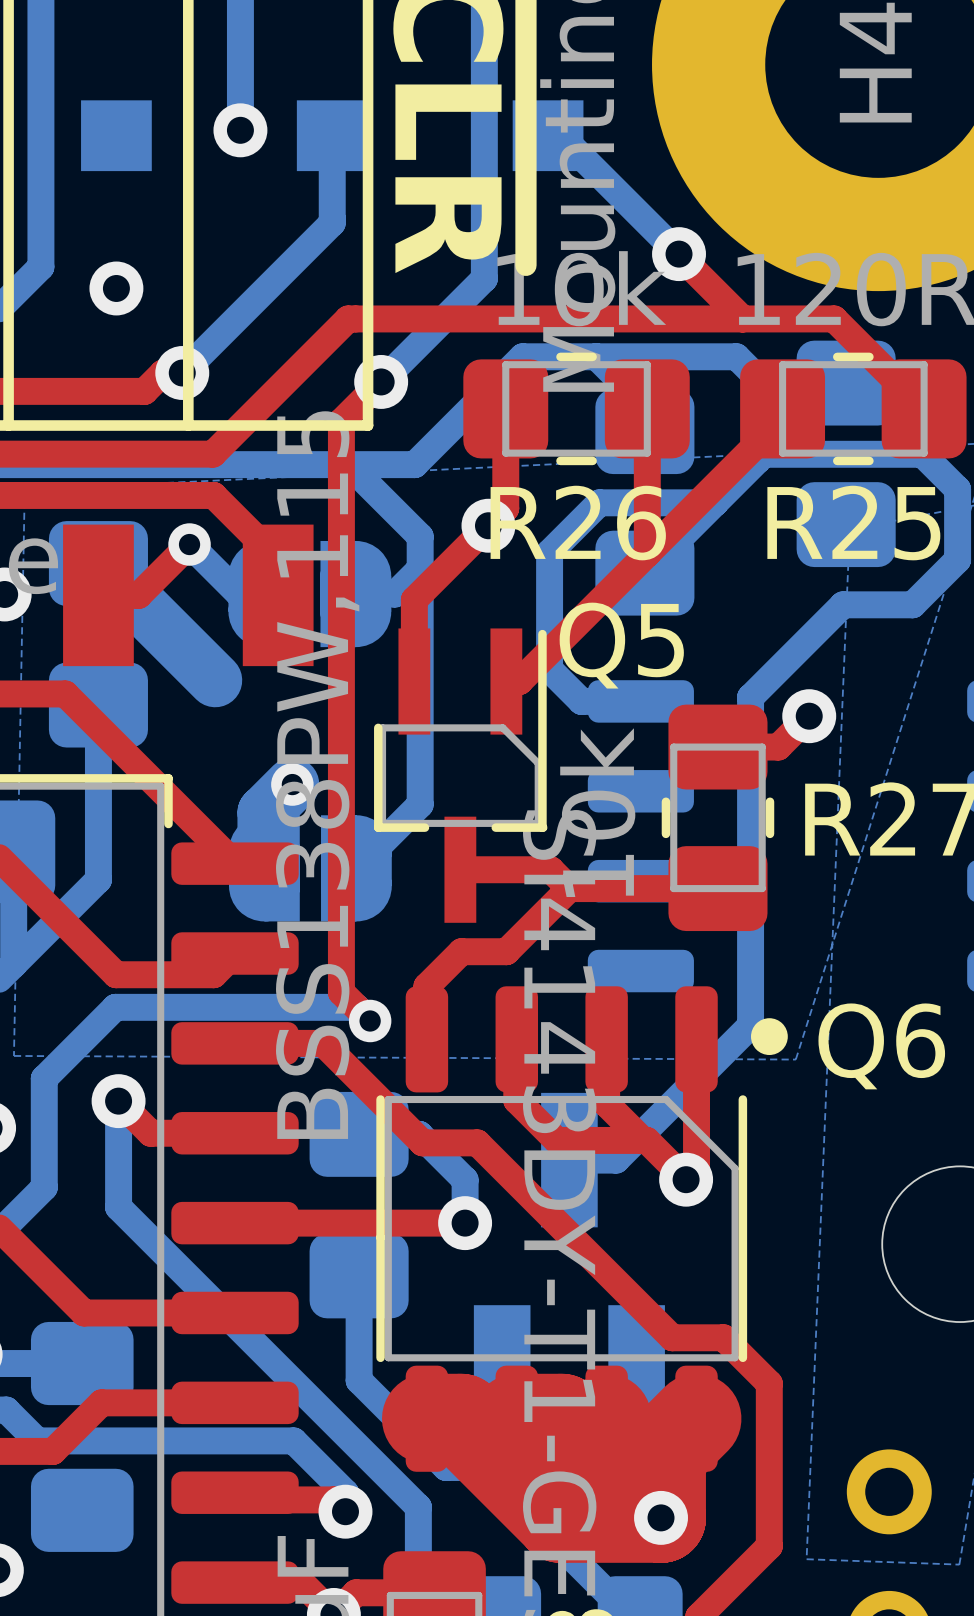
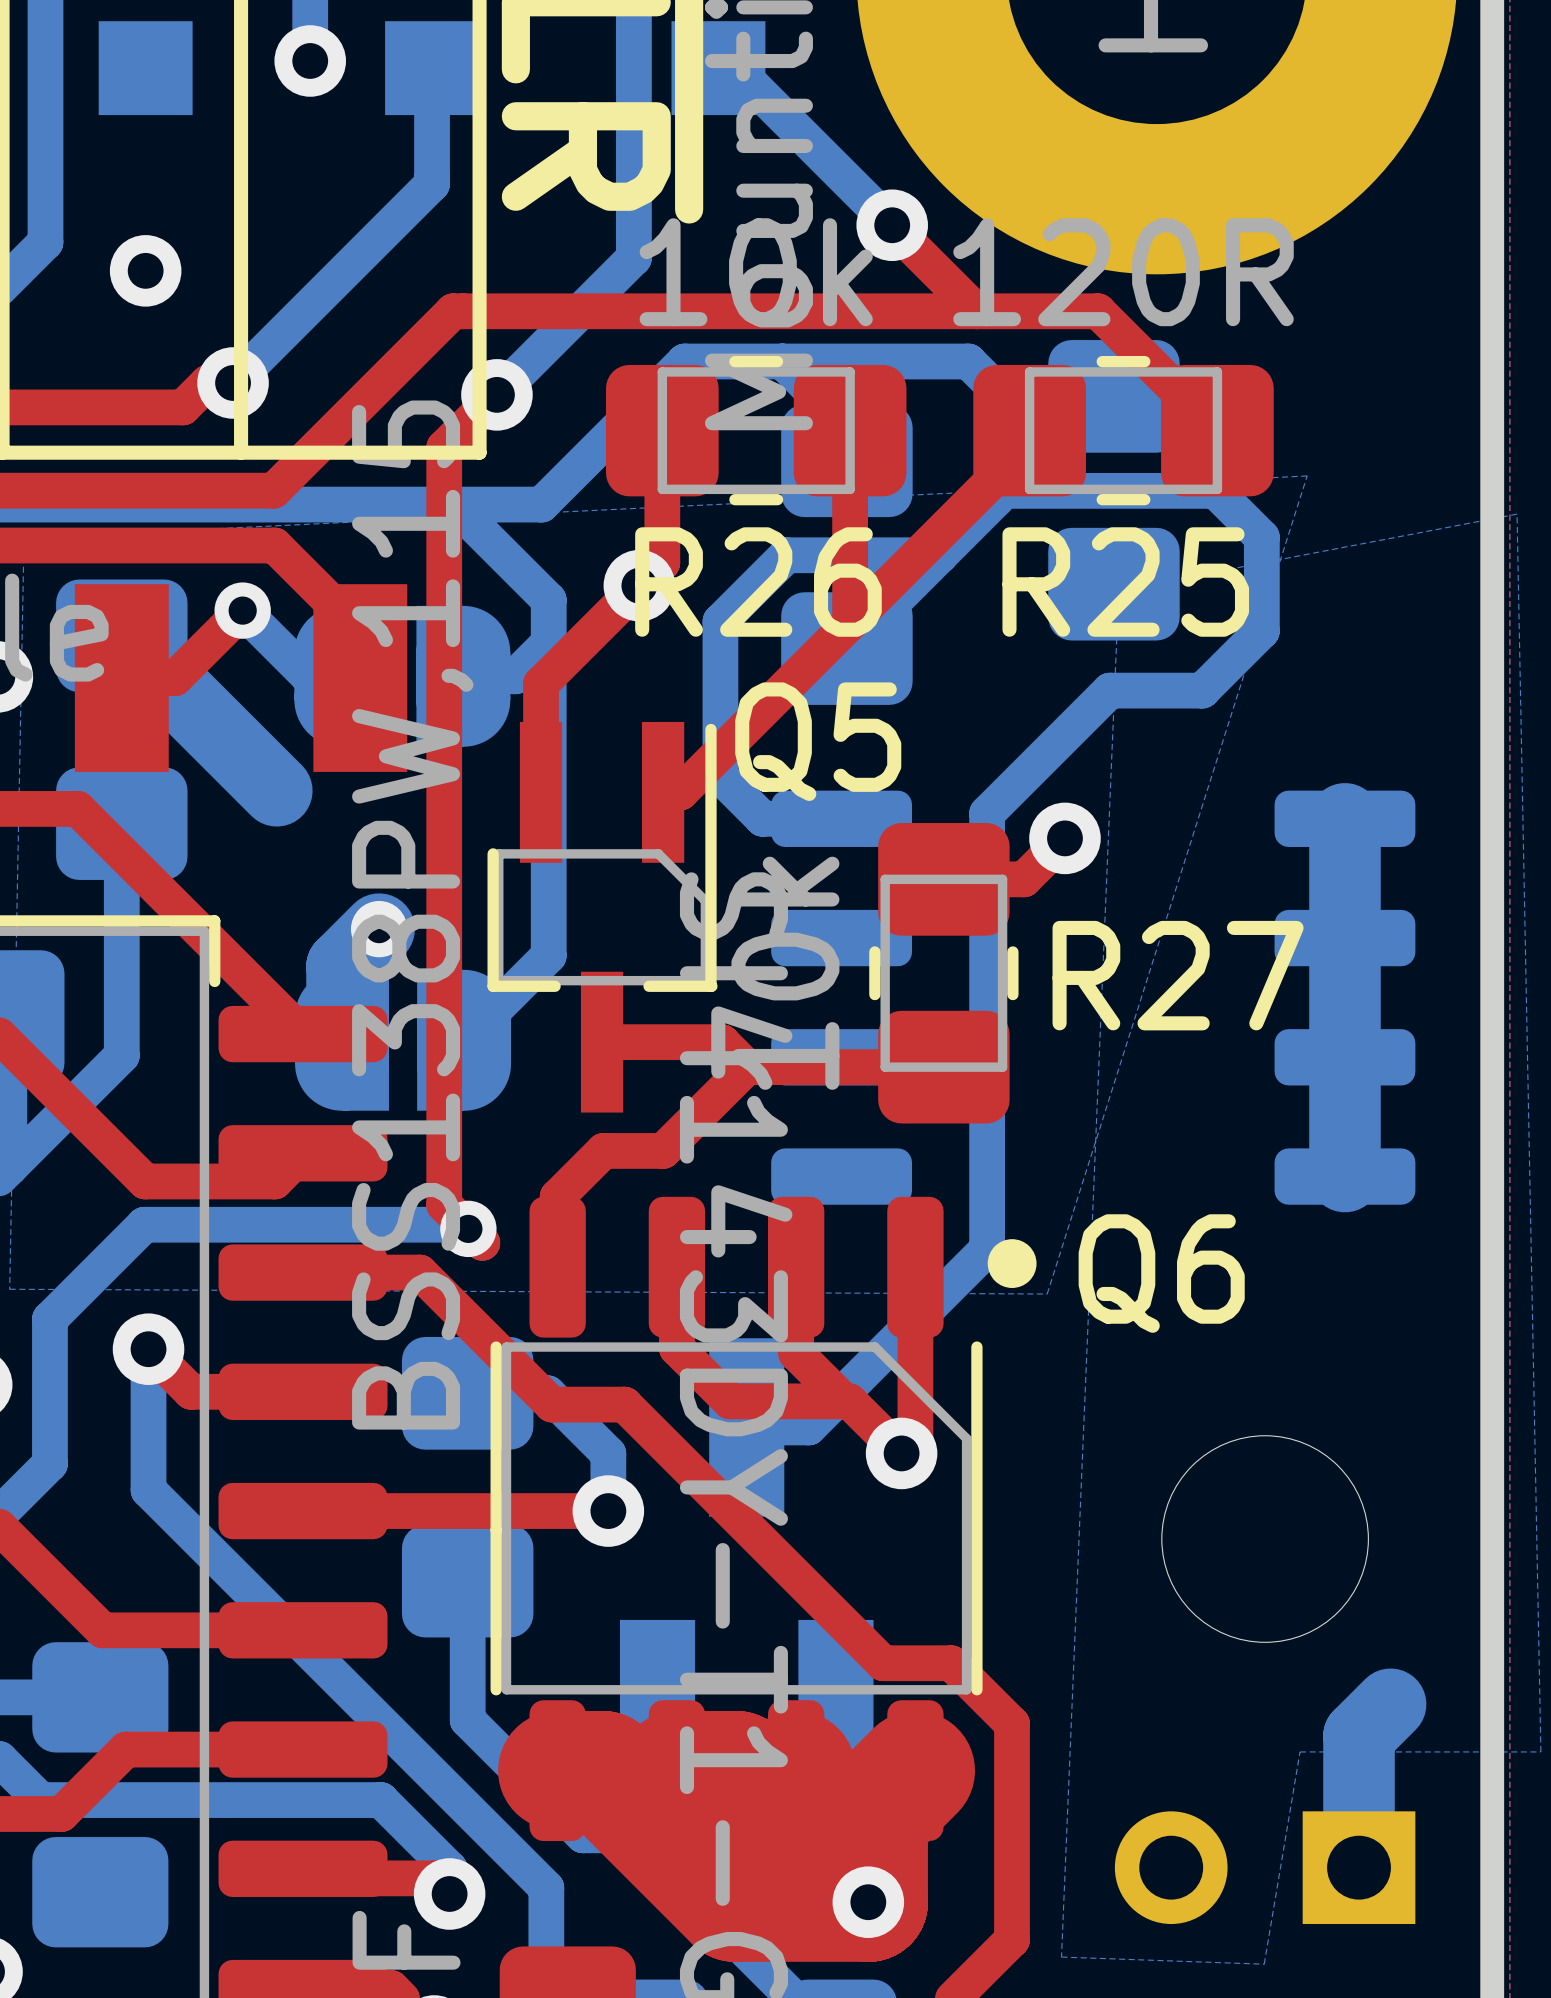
via position: (370, 1020) -> (468, 1228)

